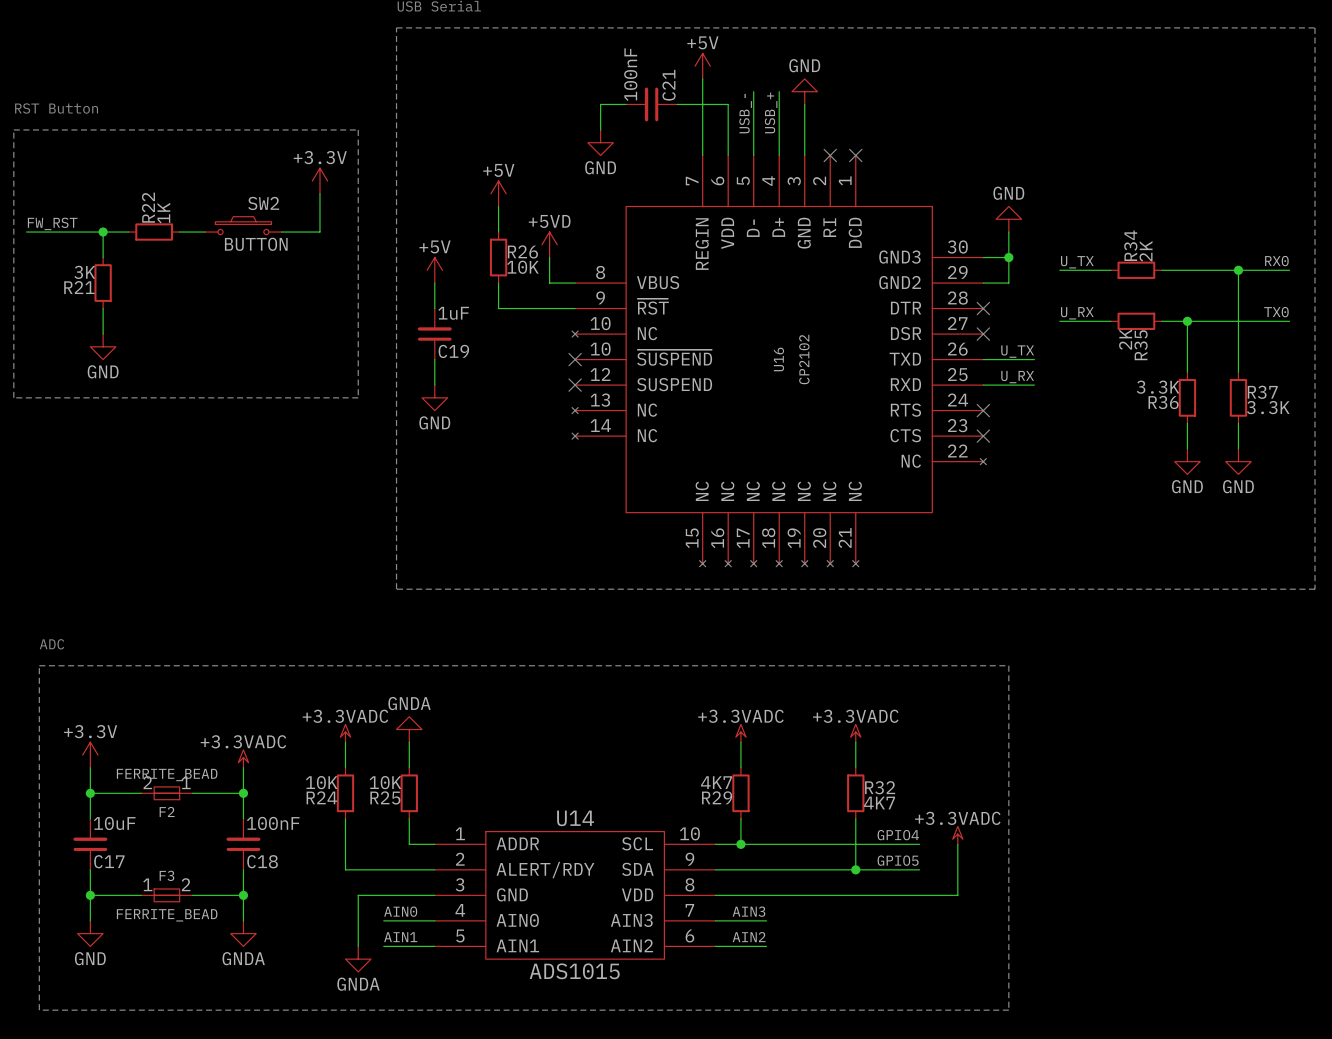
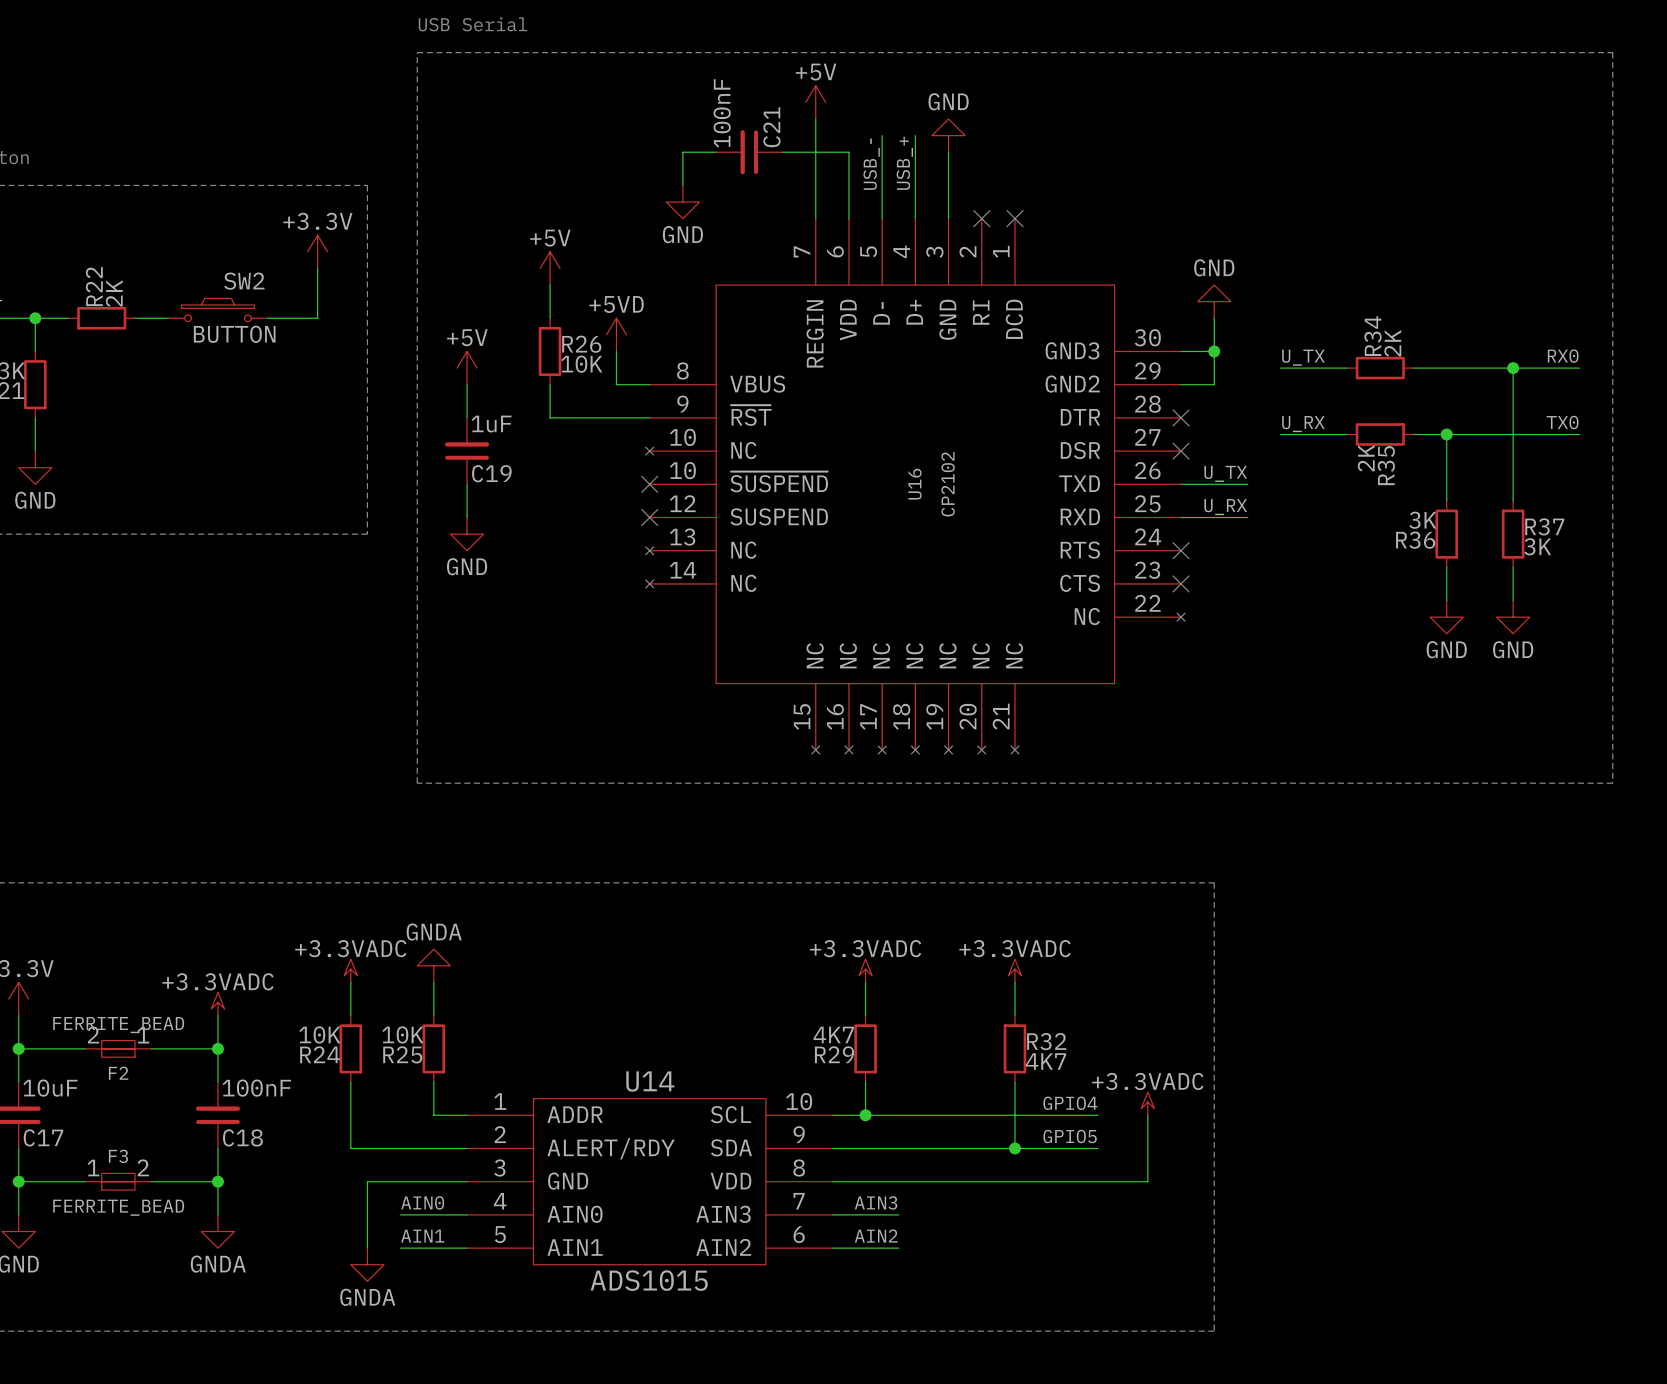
R22 value: 1K (163, 213) -> 2K (114, 293)
R36 value: 3.3K (1158, 387) -> 3K (1422, 520)
R37 value: 3.3K (1268, 407) -> 3K (1537, 546)

